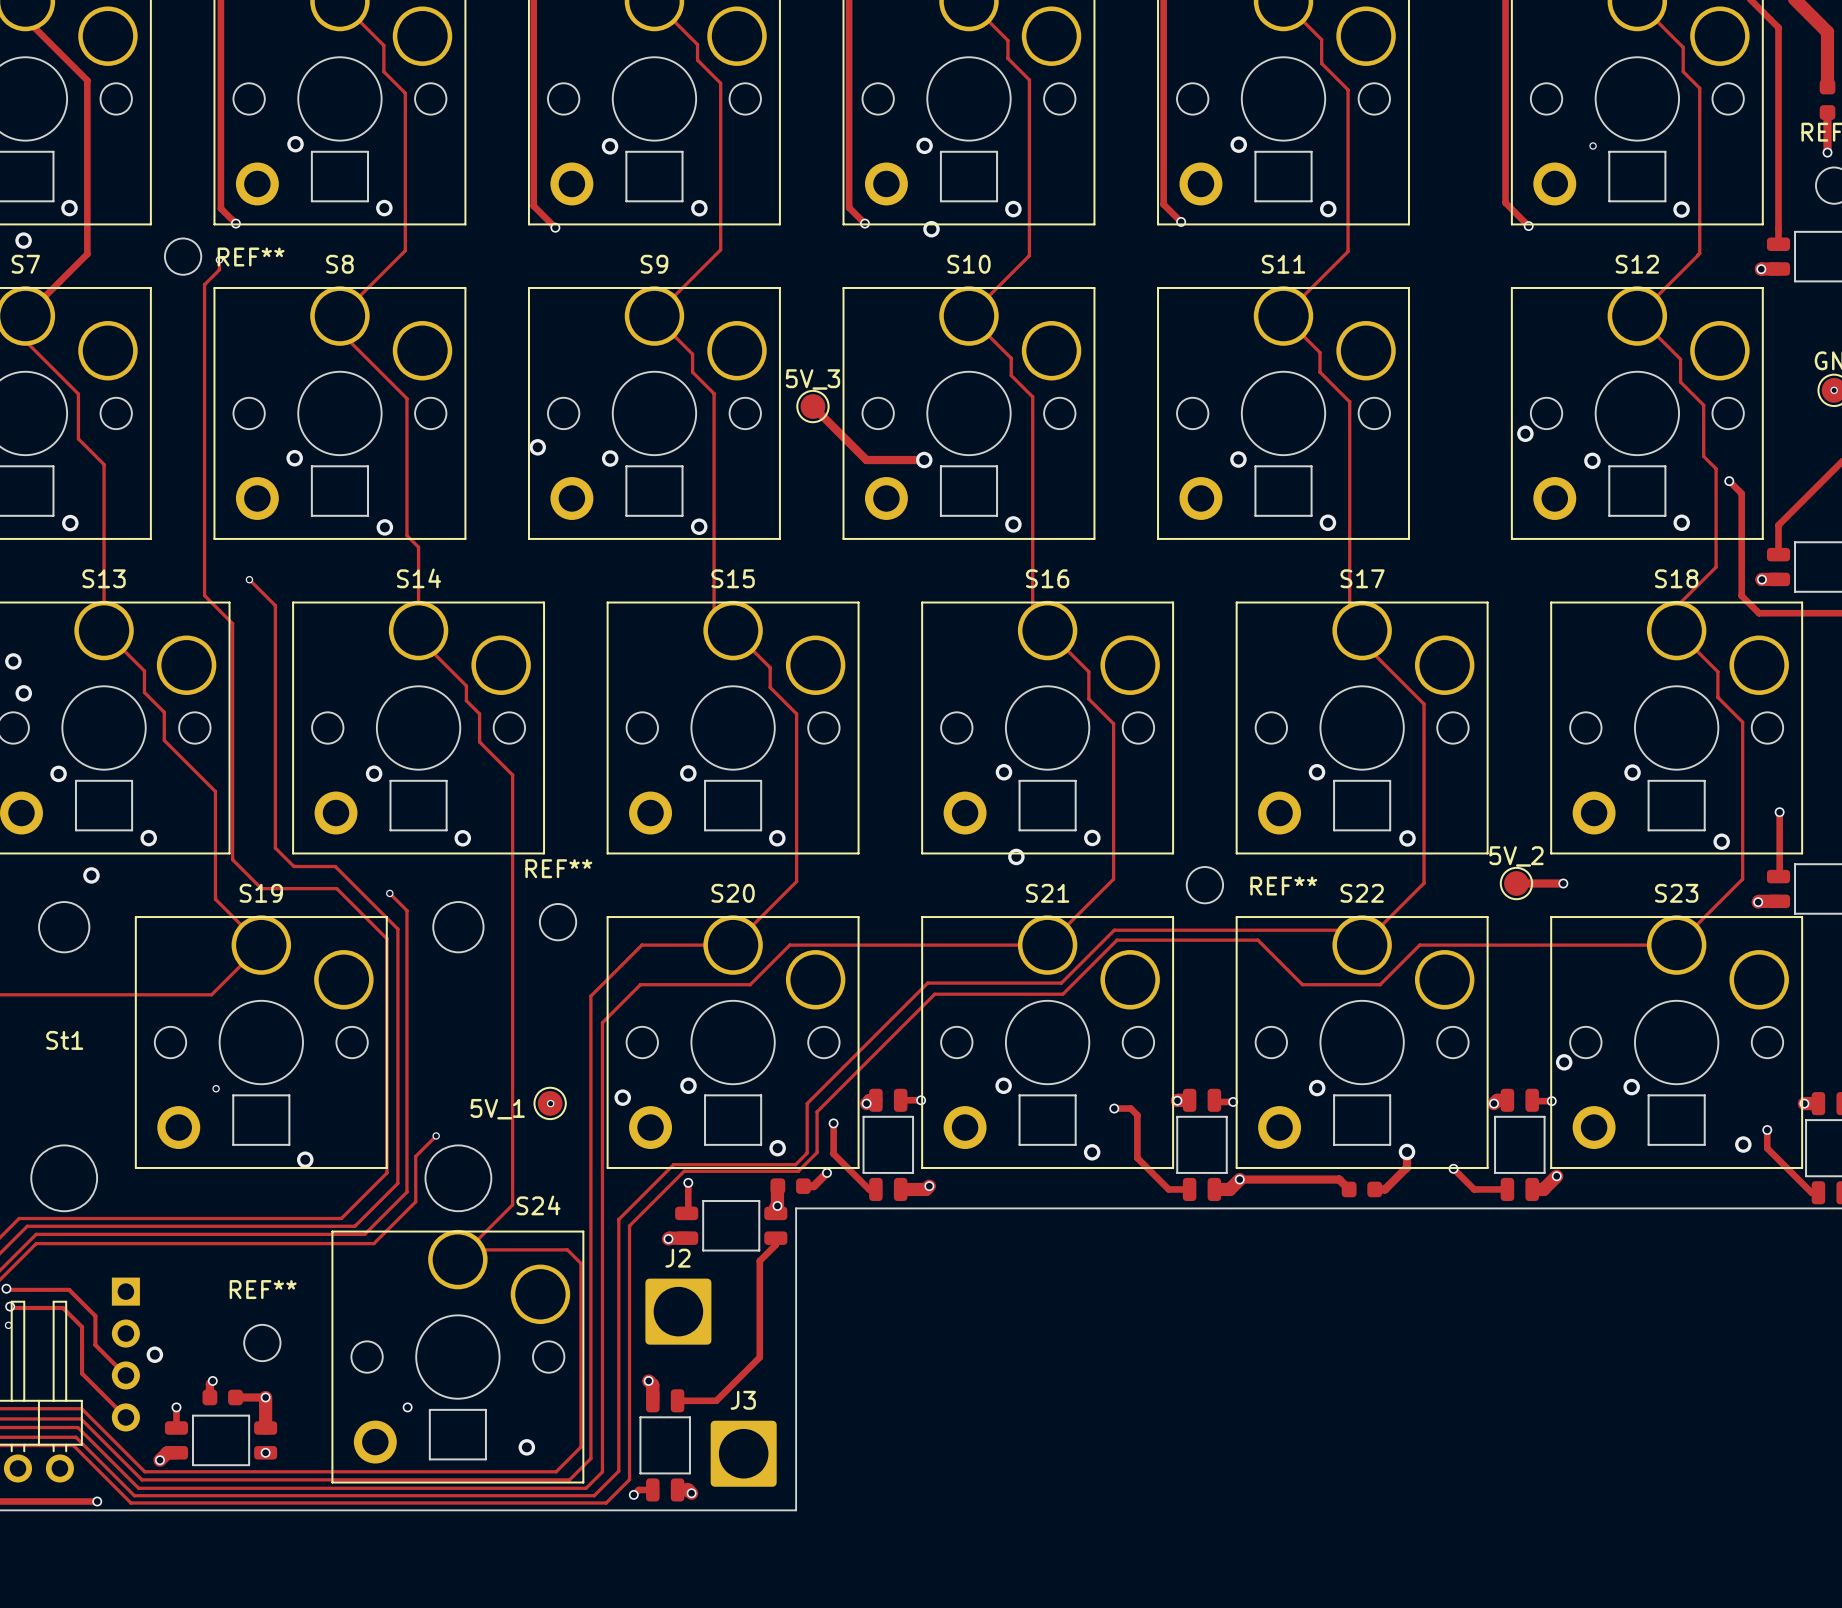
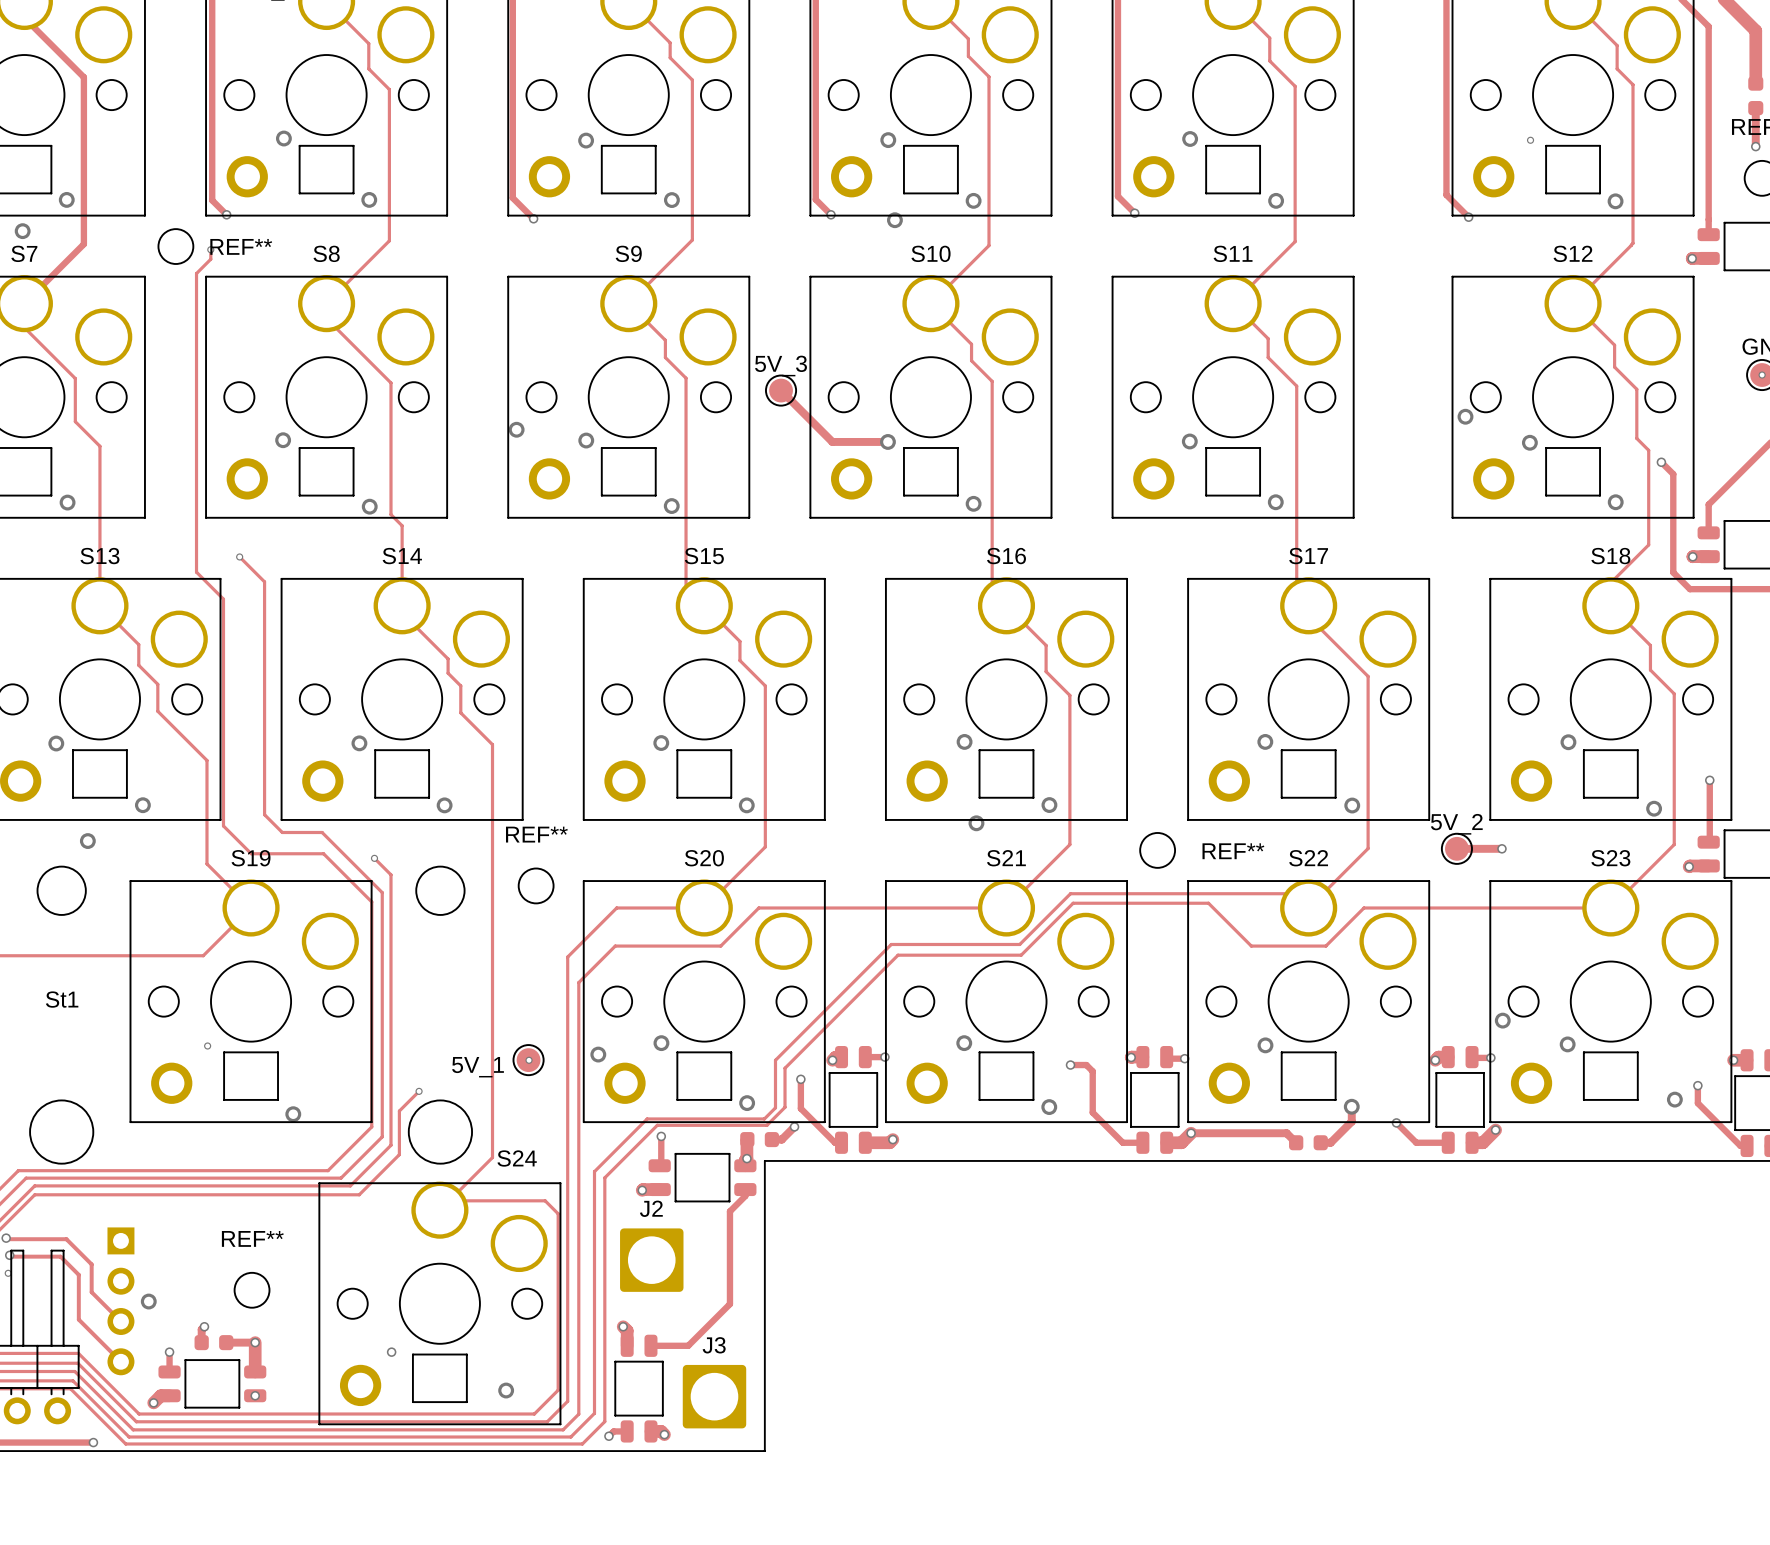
via: (13, 661) -> none
via: (23, 693) -> none

